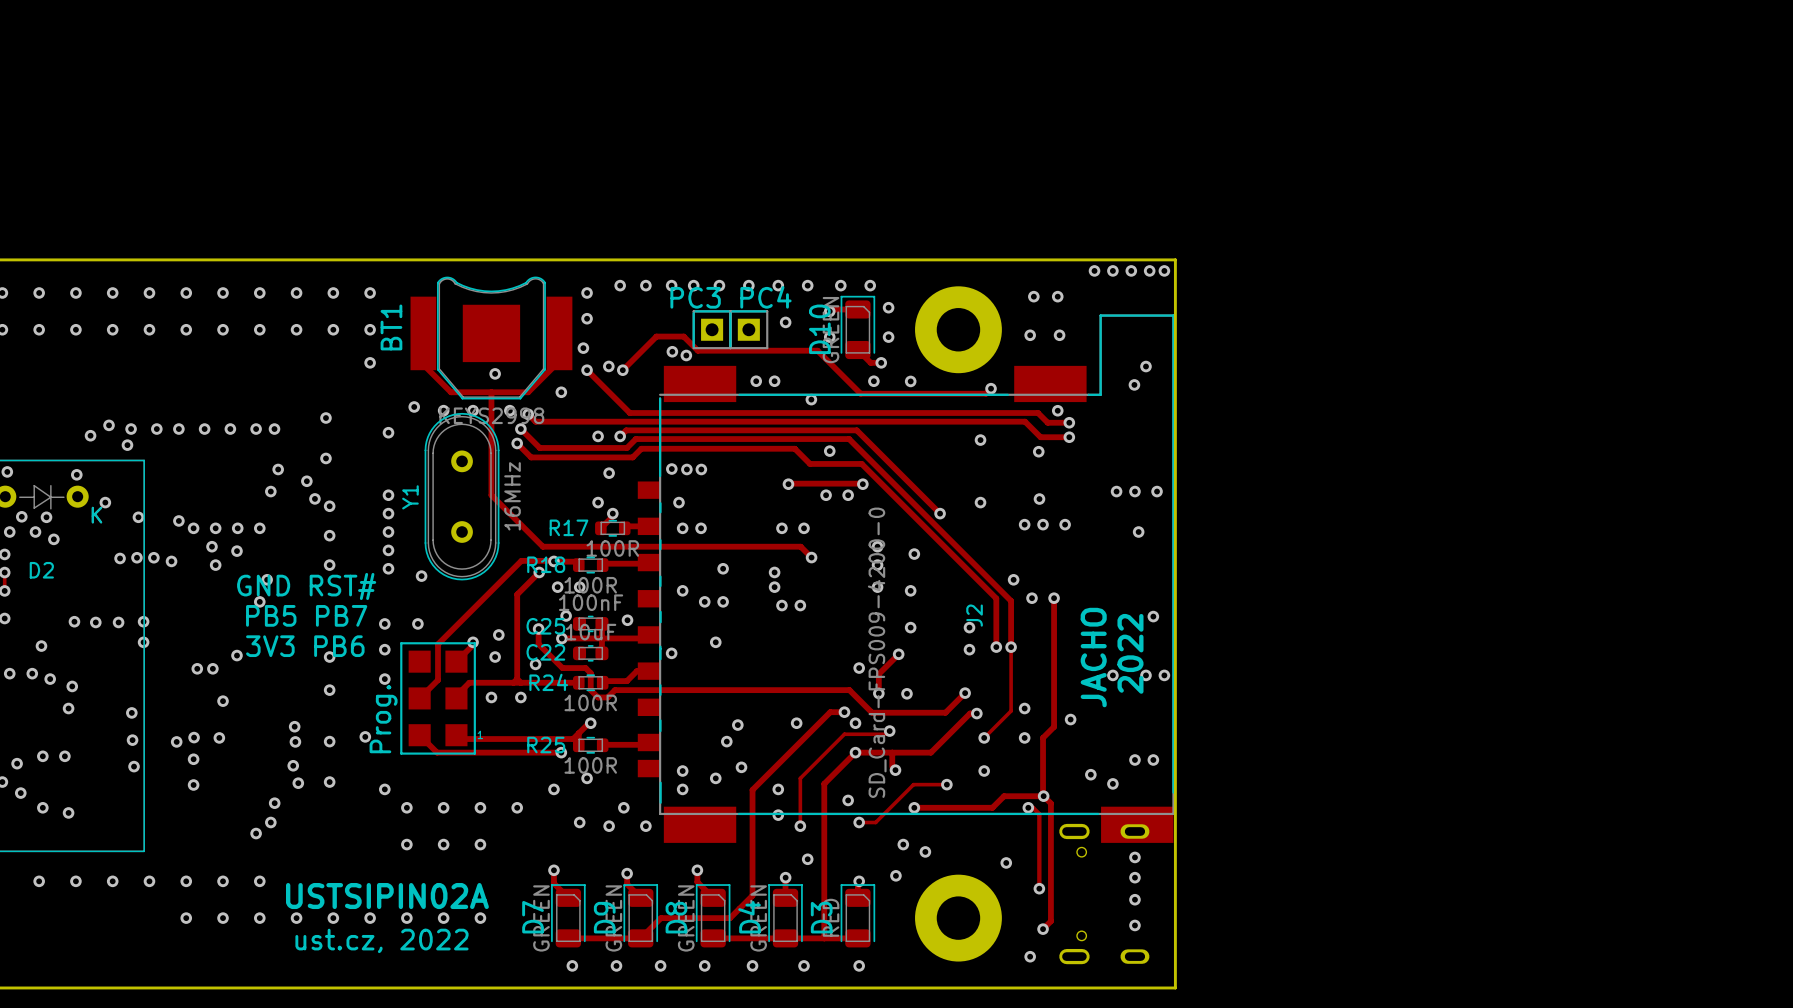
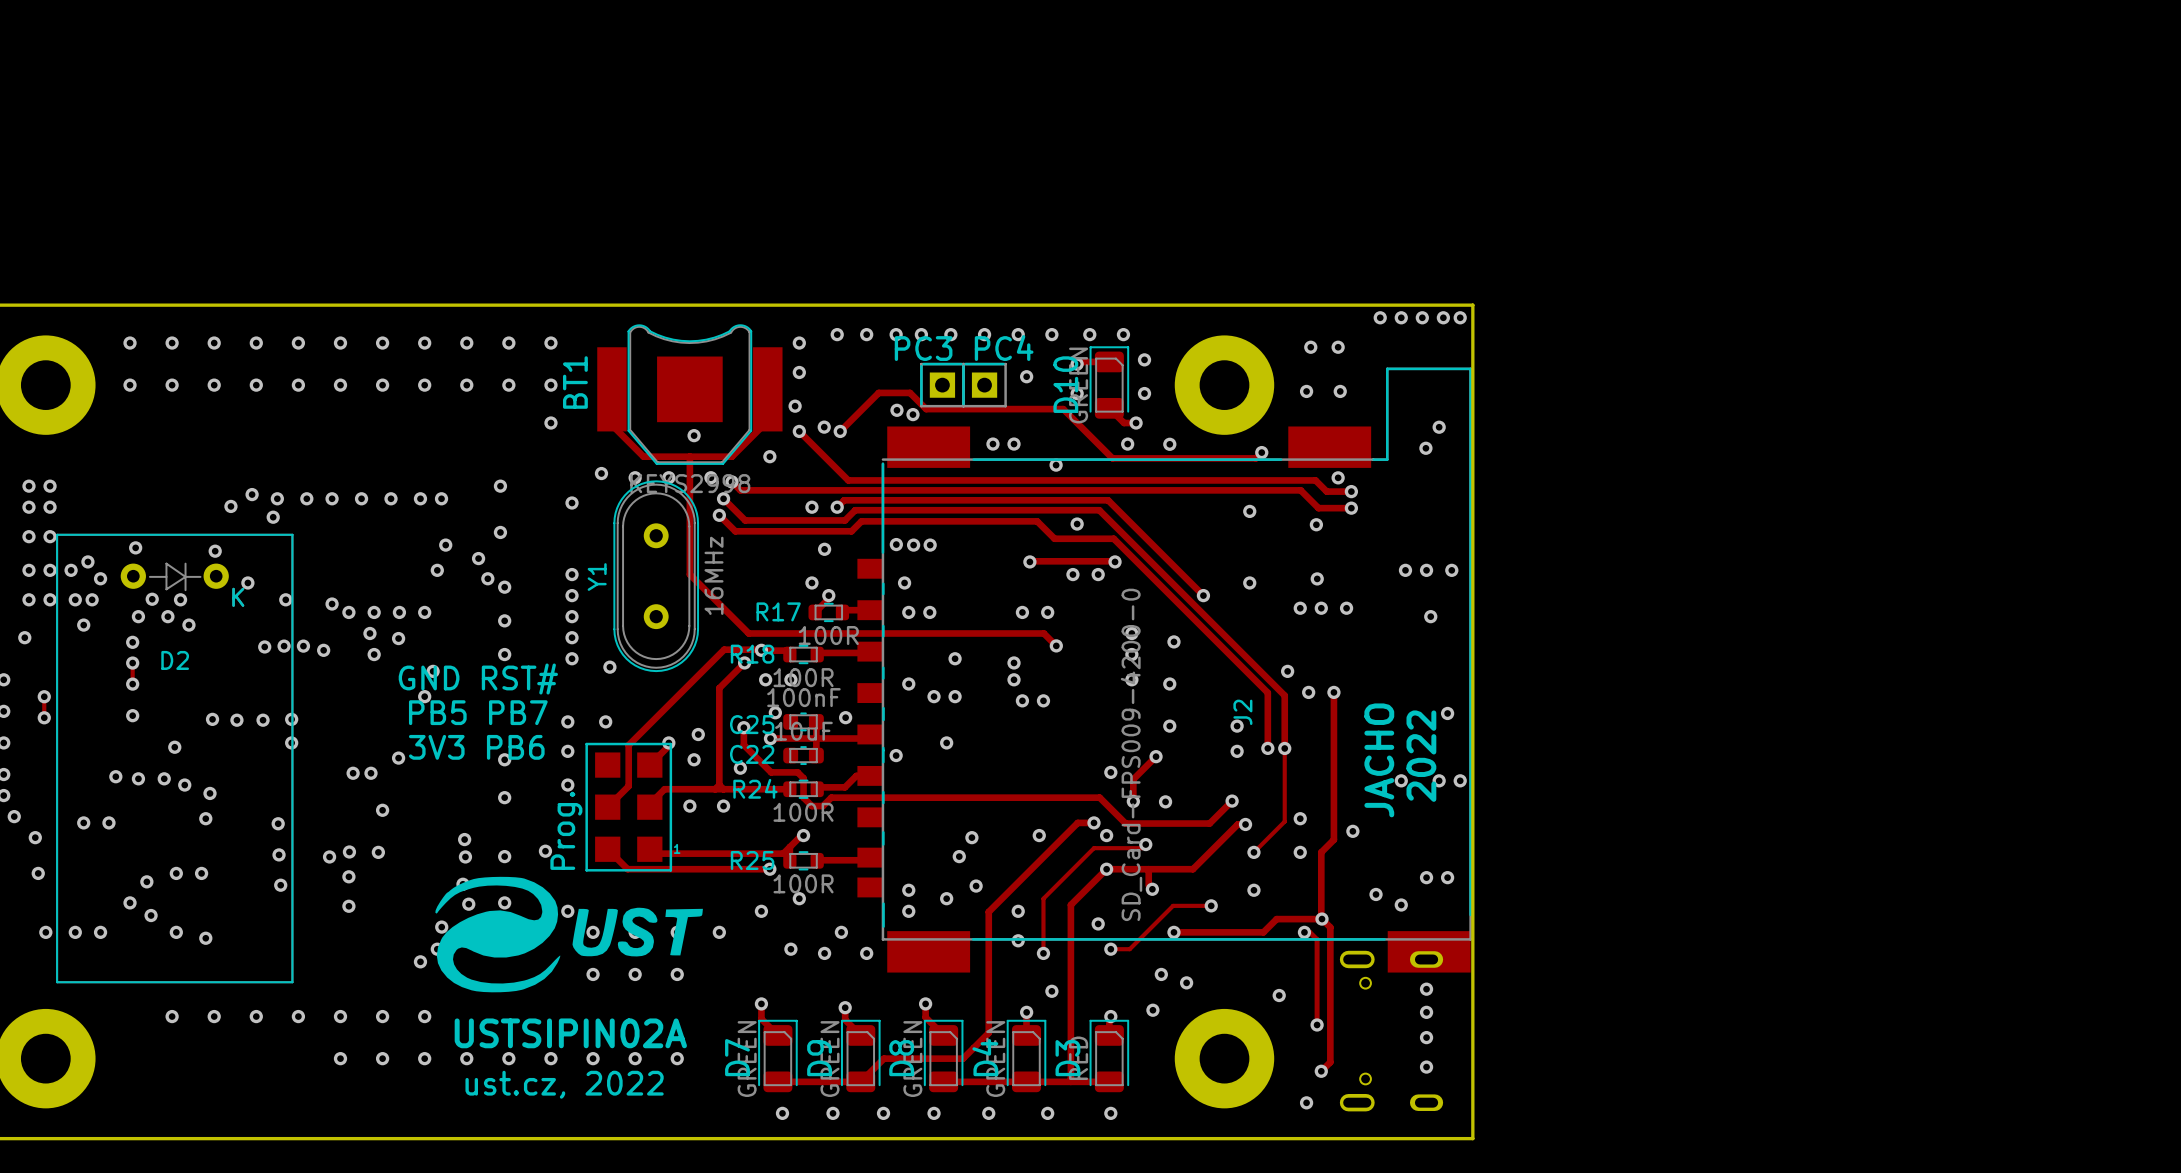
drawing: none -> [435, 876, 703, 993]

